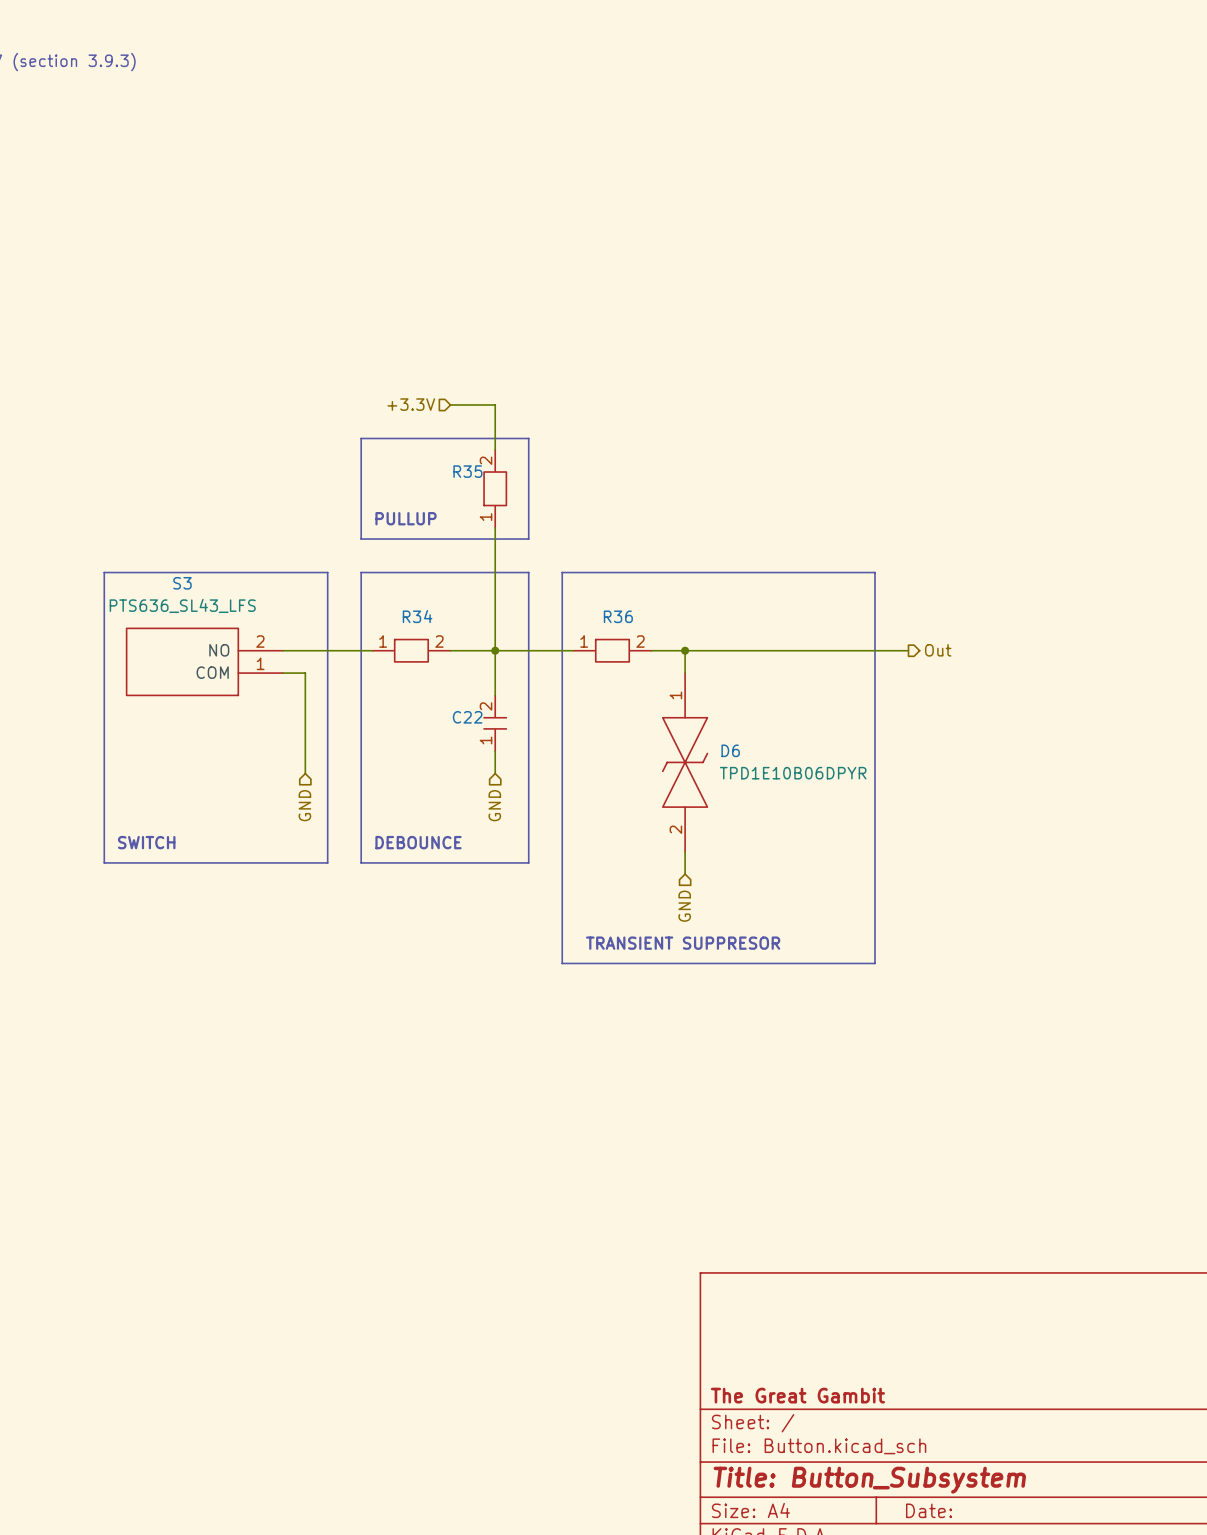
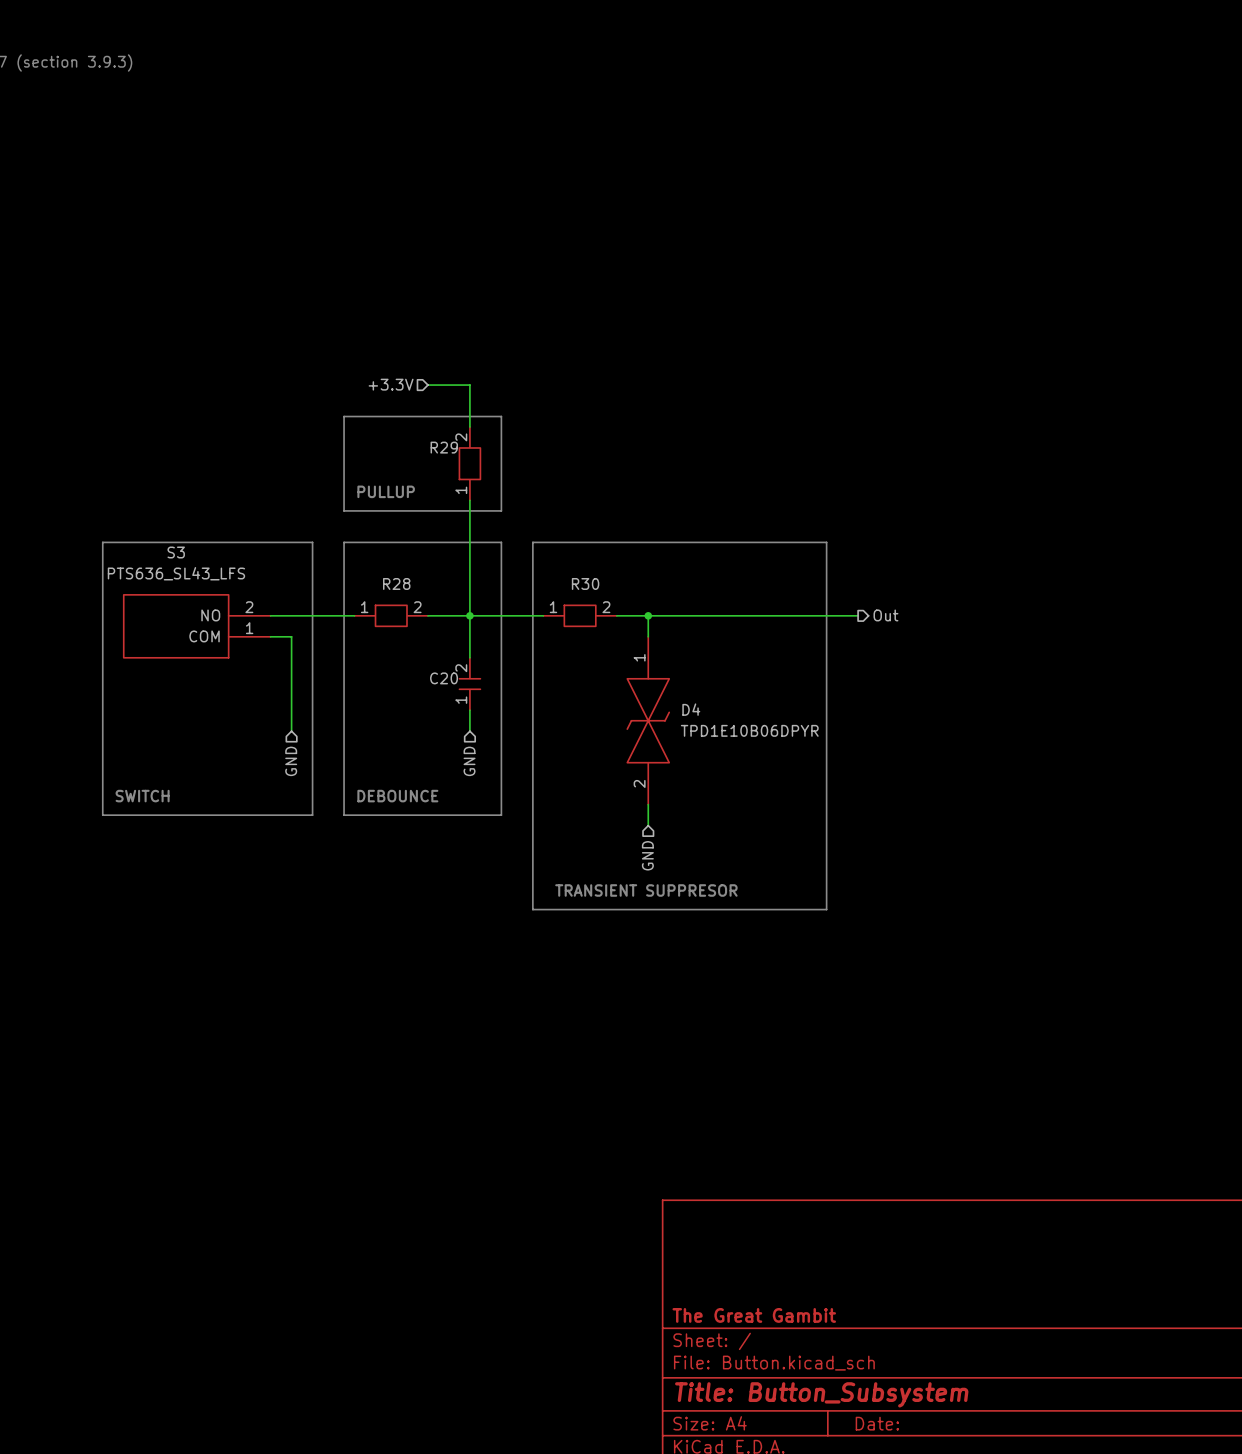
R35 name: R35 (467, 471) -> R29 (444, 447)
R34 name: R34 (417, 616) -> R28 (396, 583)
R36 name: R36 (618, 616) -> R30 (585, 583)
C22 name: C22 (467, 717) -> C20 (444, 678)
D6 name: D6 (730, 750) -> D4 (691, 709)

